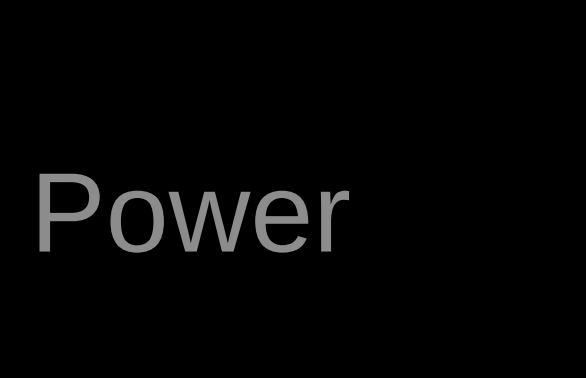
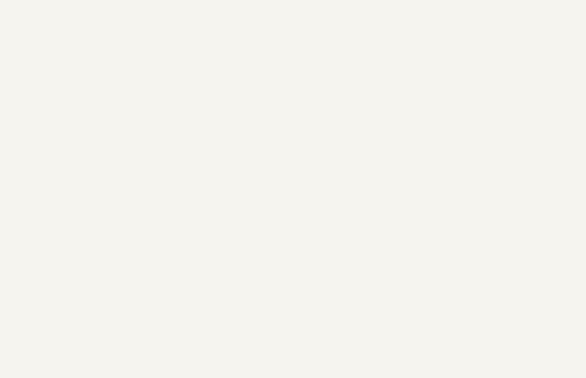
text: Power (194, 213) -> none

